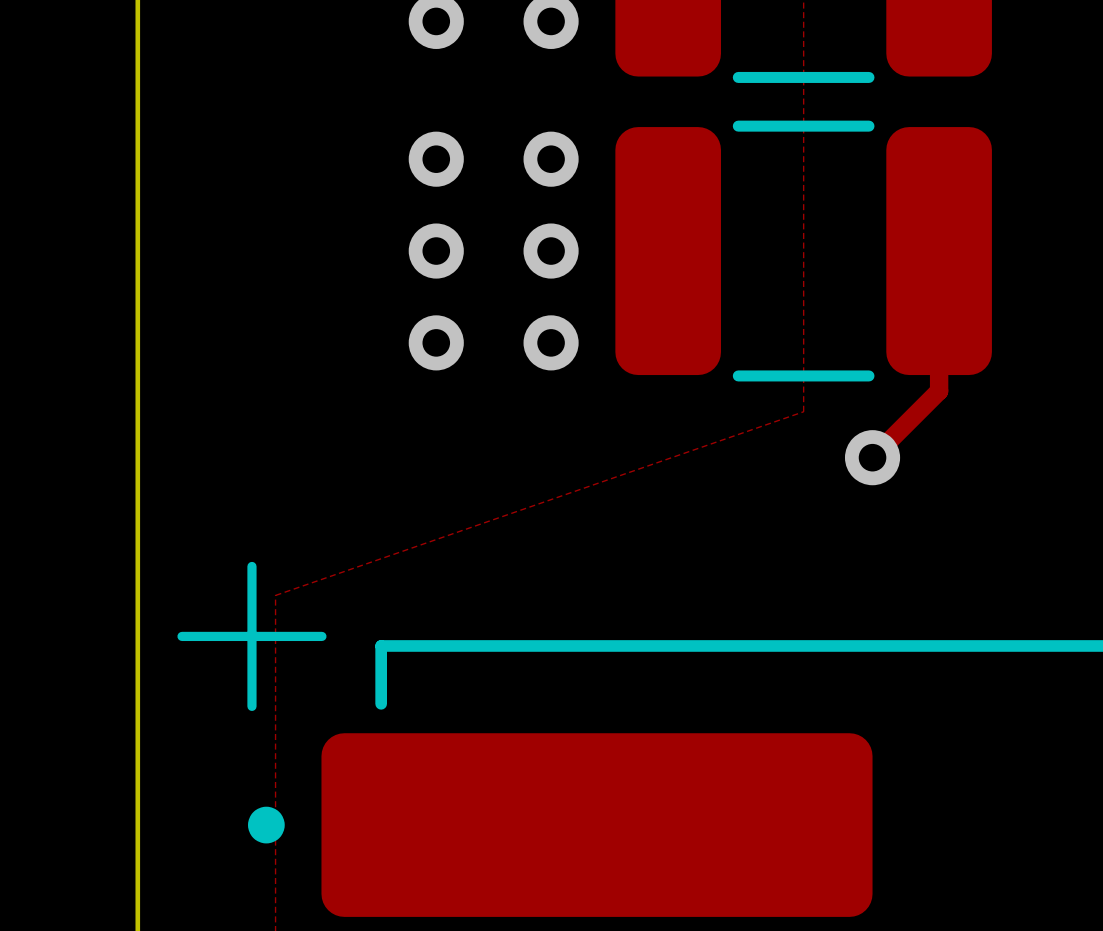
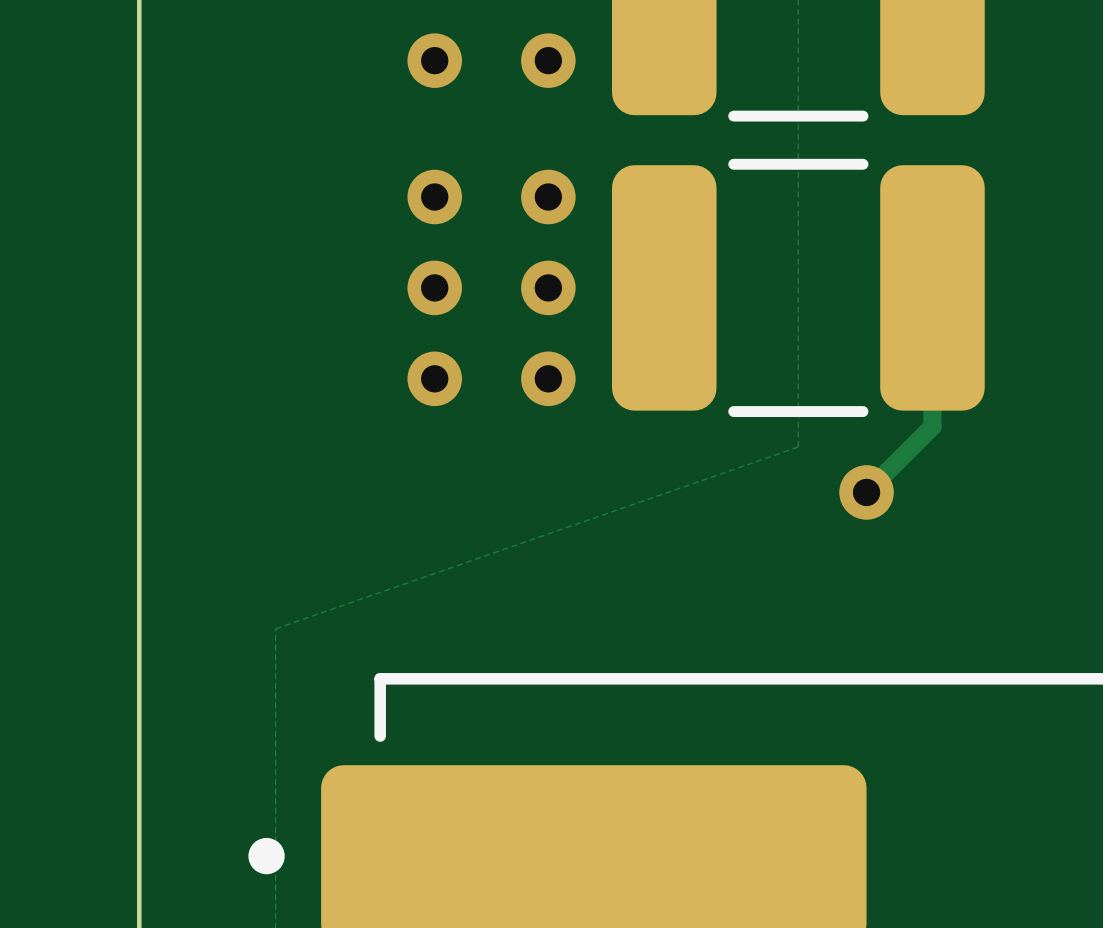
text: + (251, 636) -> none

